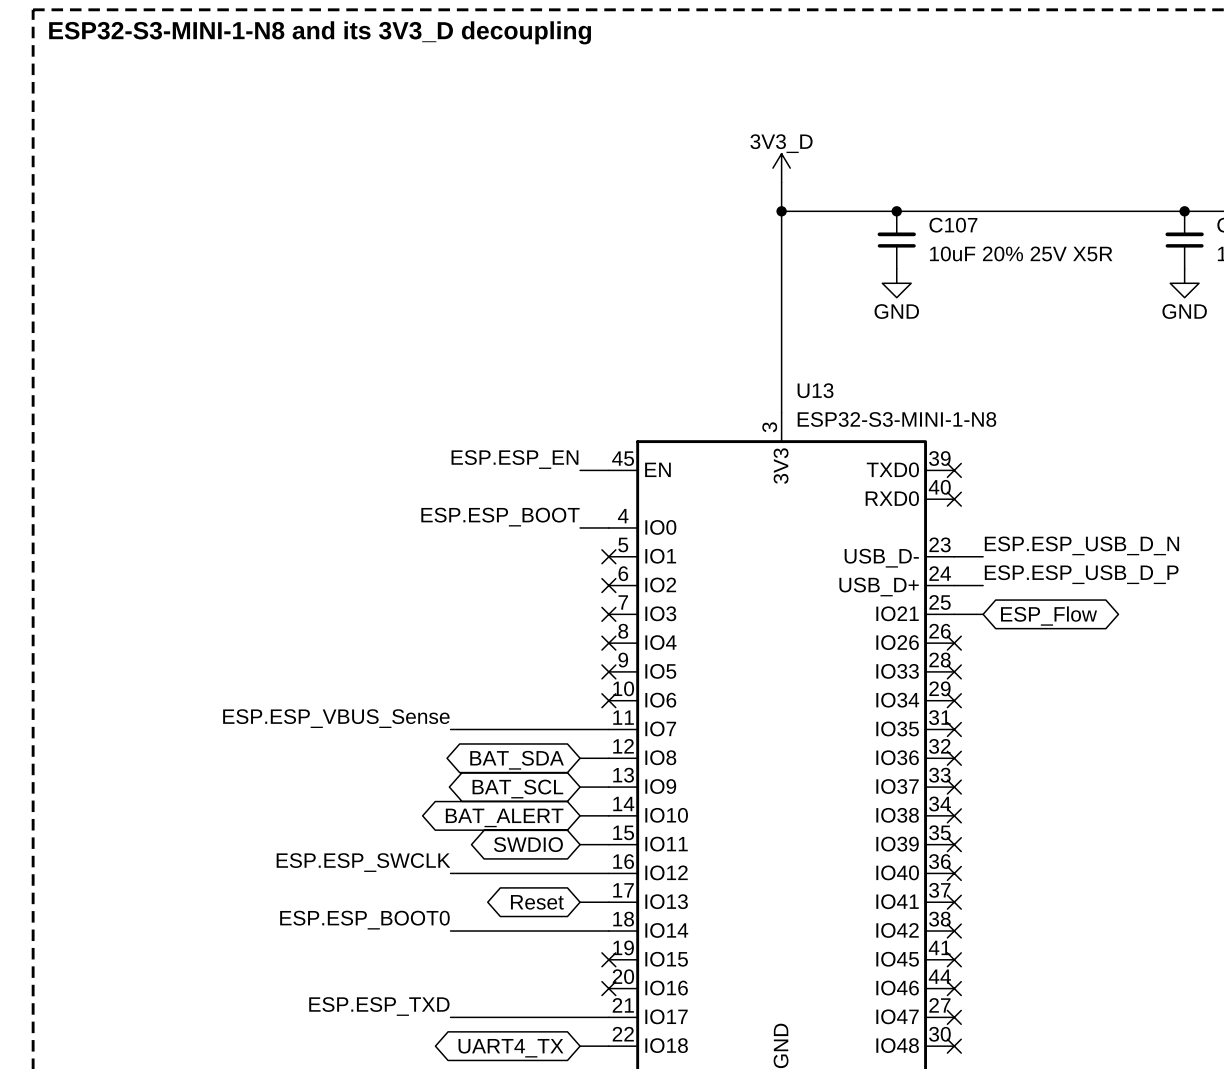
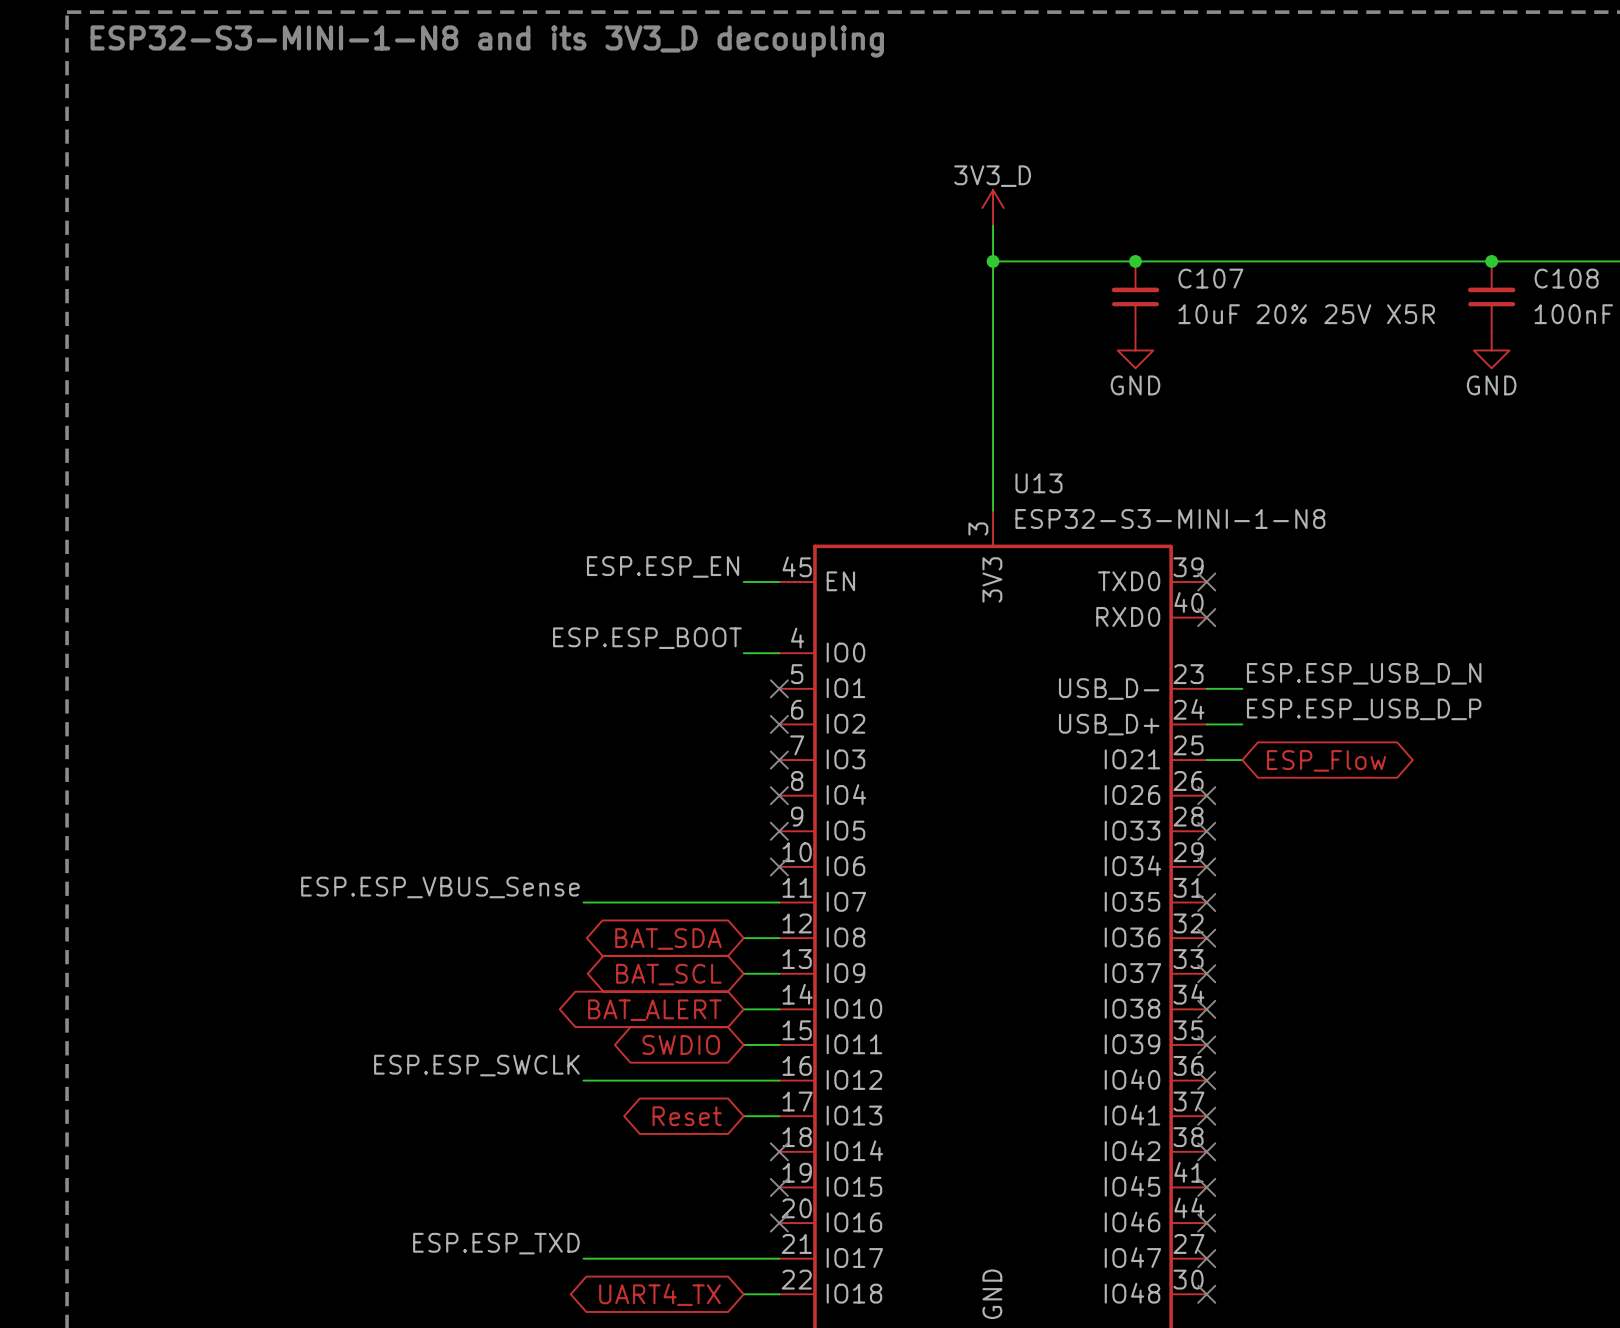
label: ESP.ESP_BOOT0 (364, 920) -> none
wire: (450, 931) (608, 931) -> none
no-connect mark: none -> (779, 1151)

